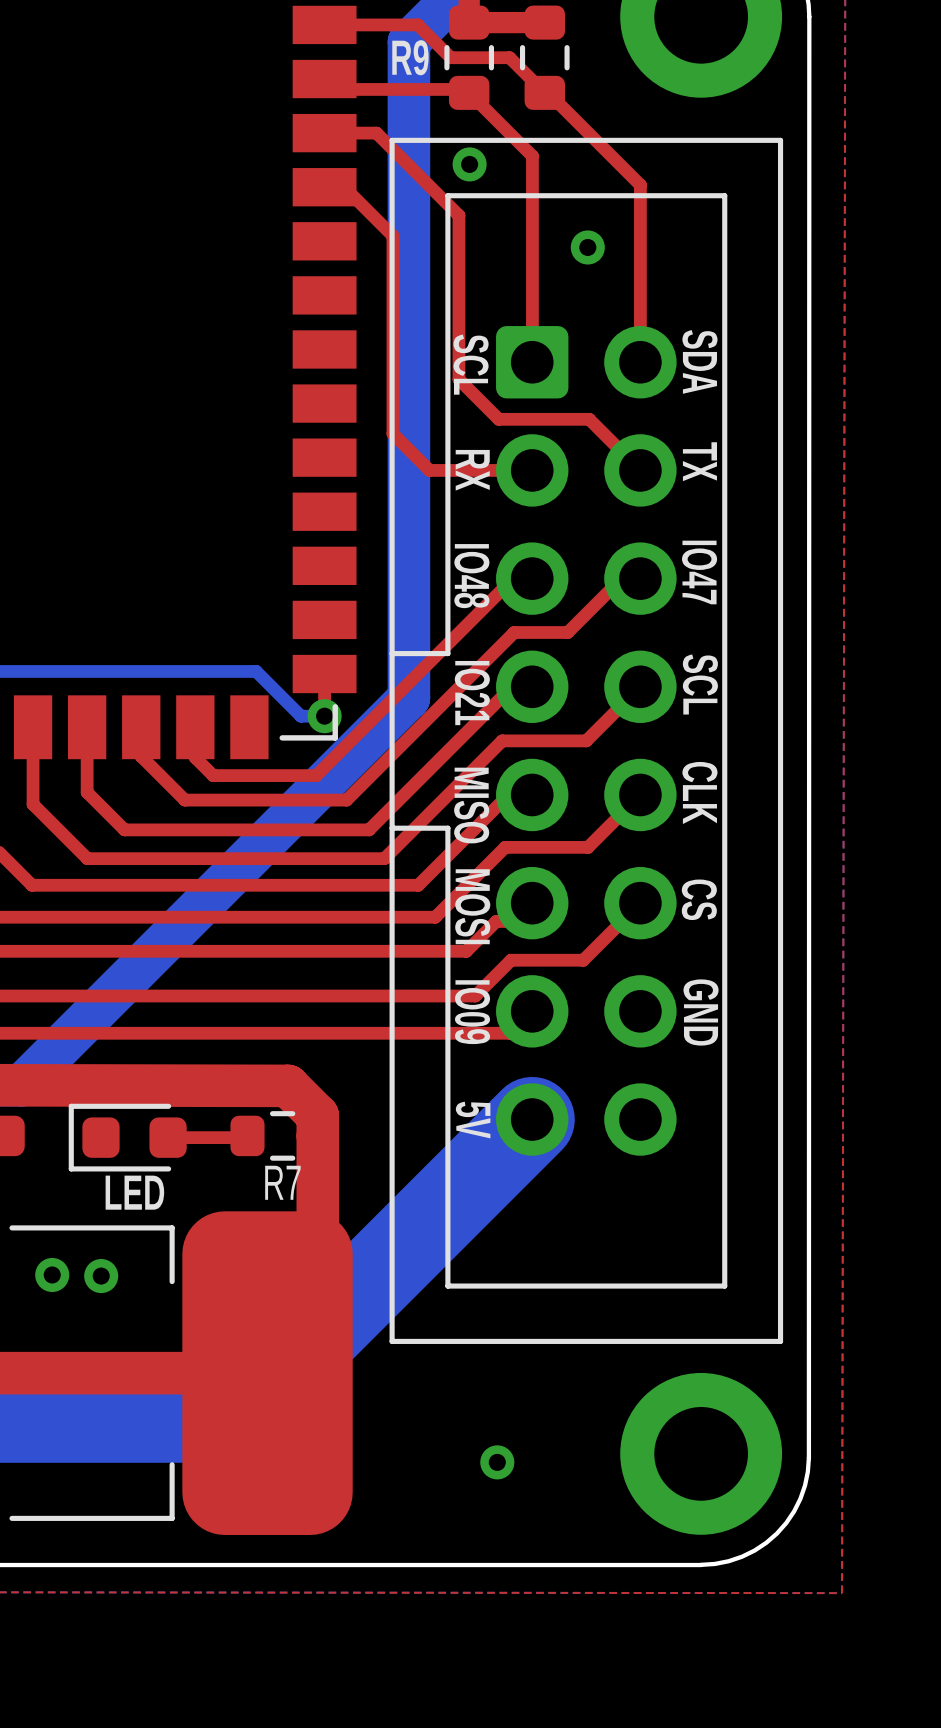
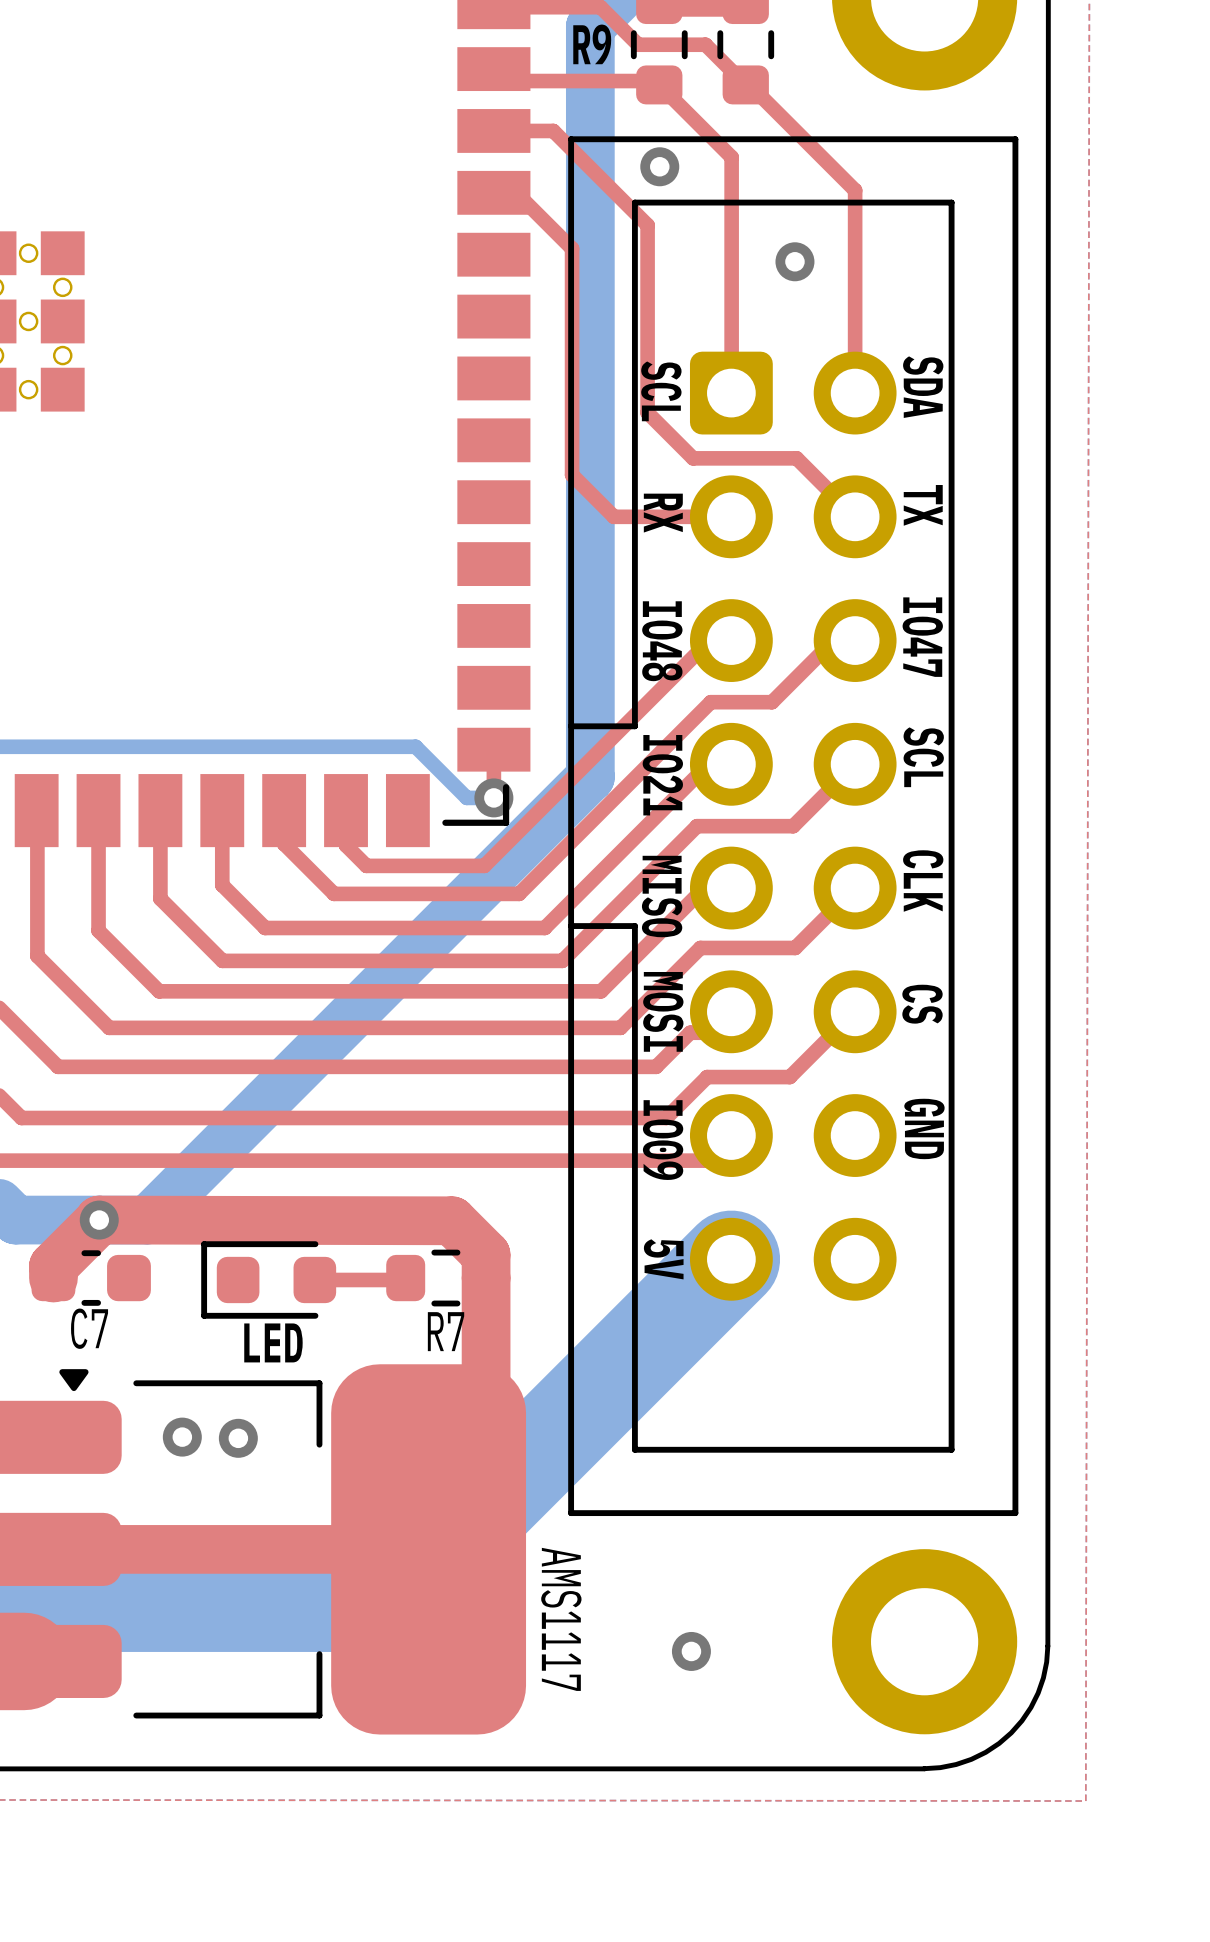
part text: none -> AMS1117 (561, 1619)

